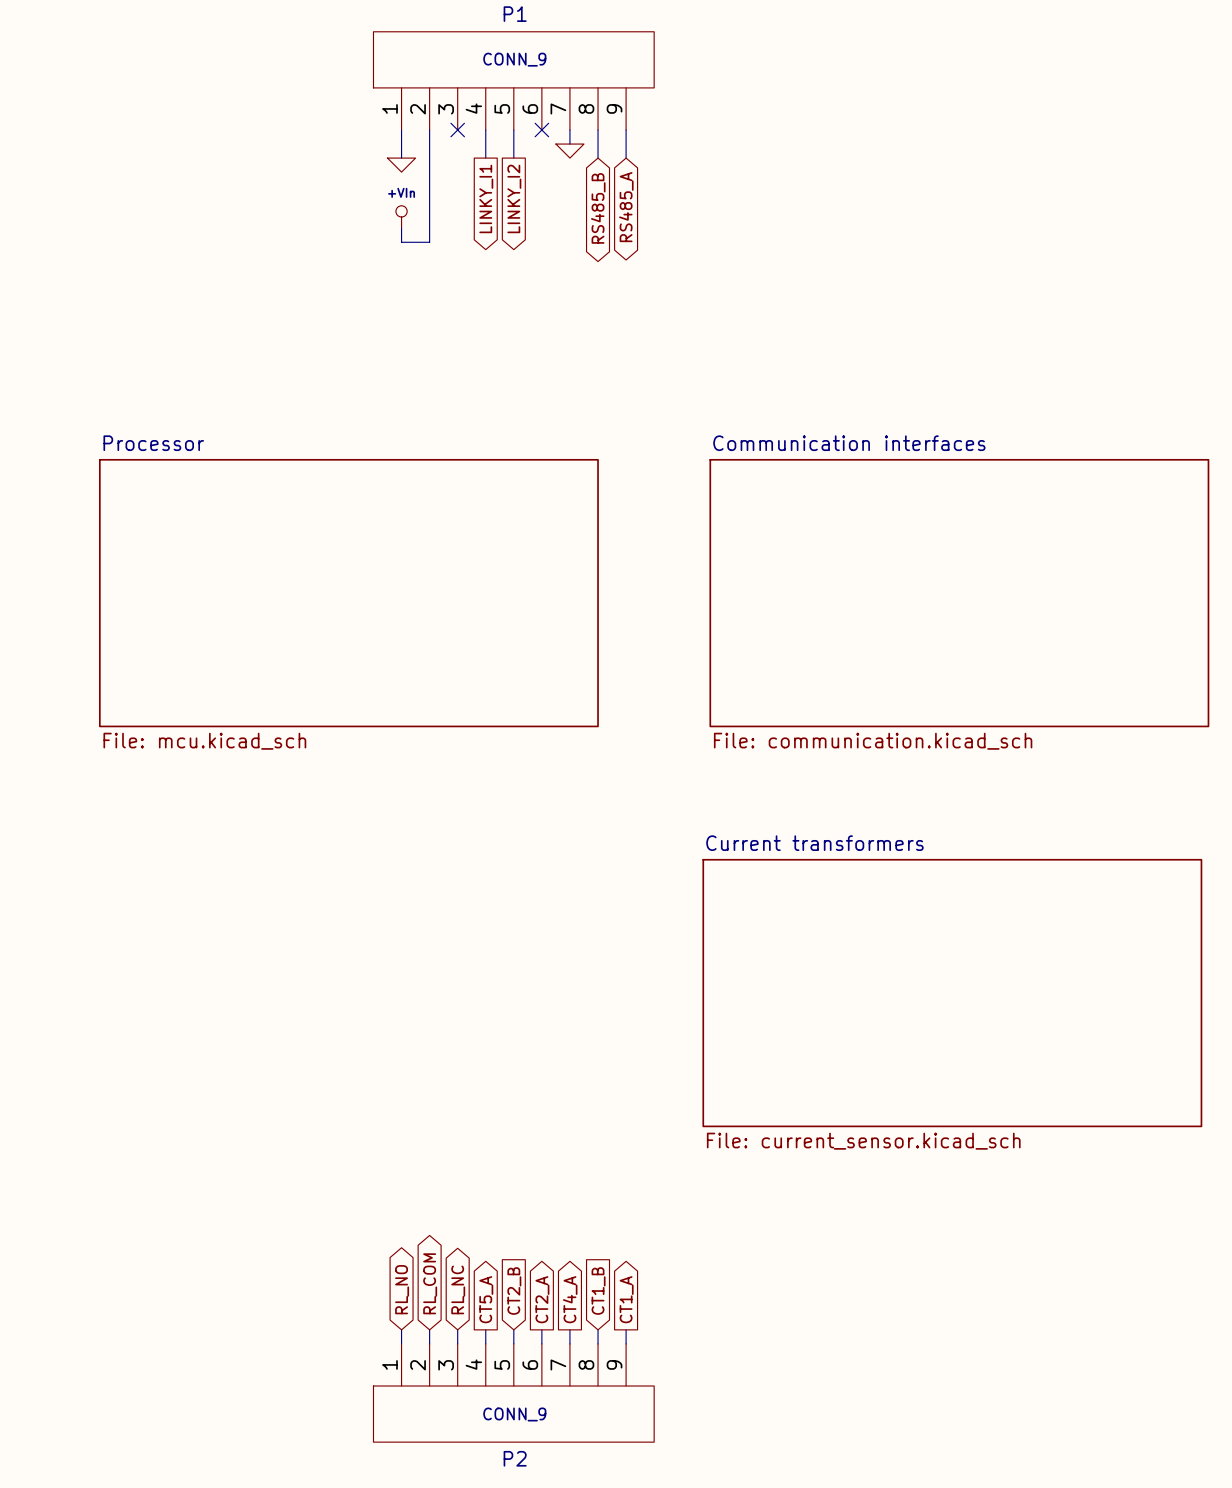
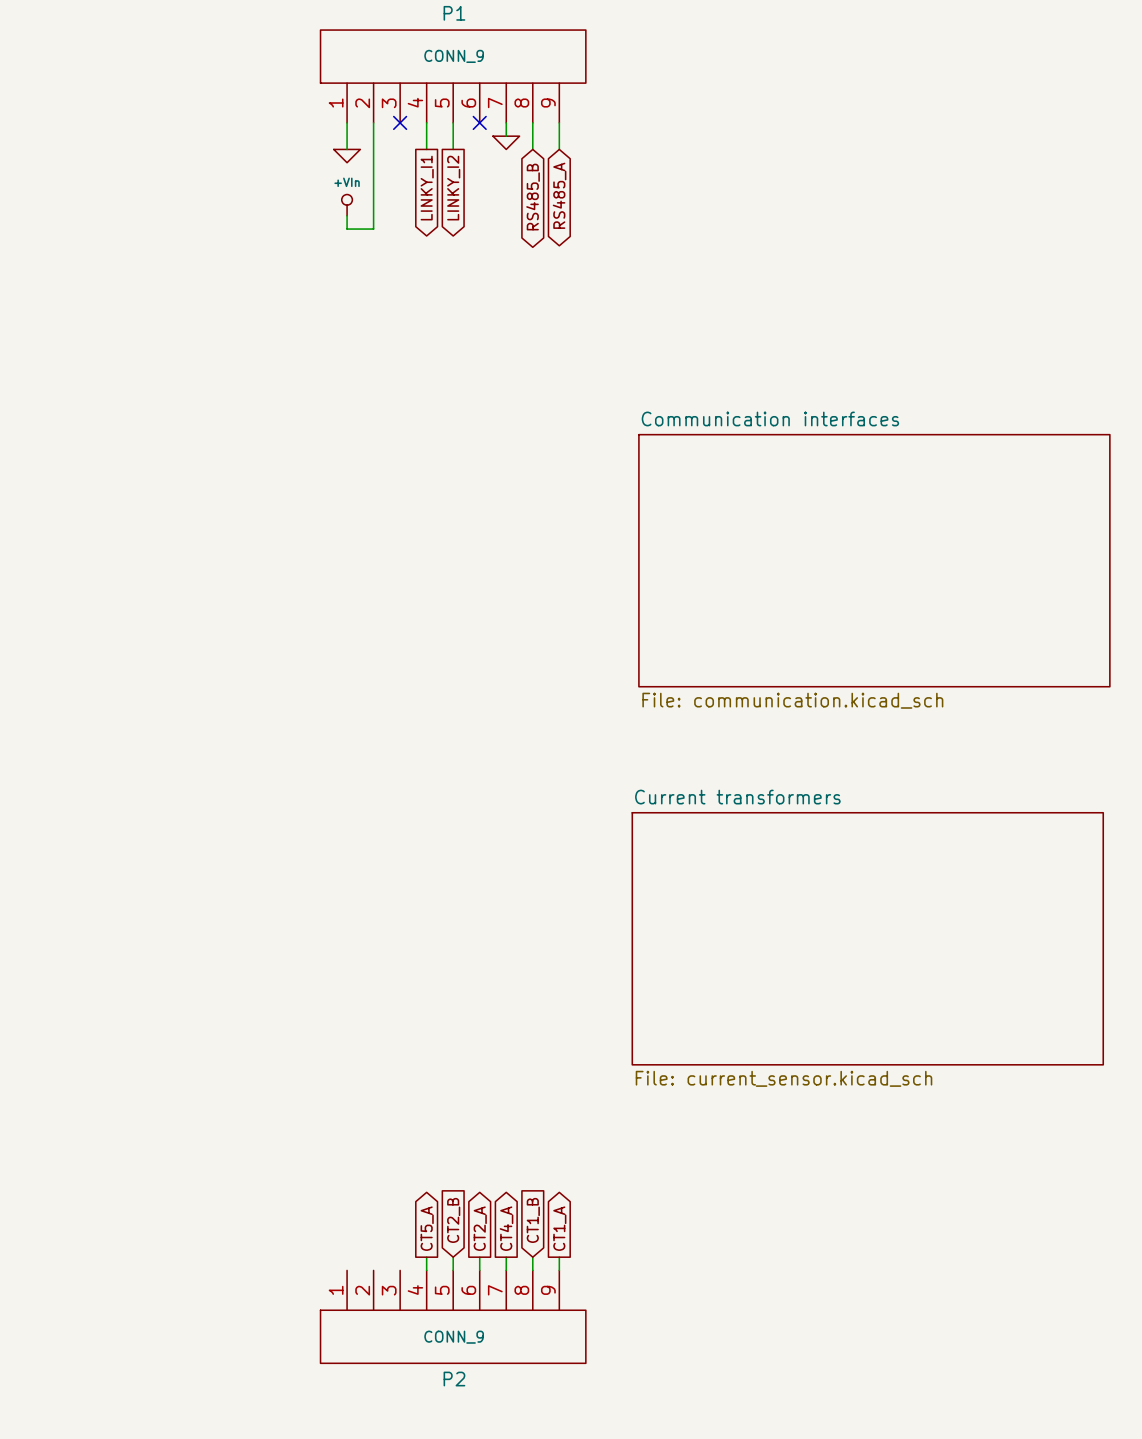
sheet Processor: File: mcu.kicad_sch (348, 593) -> none
global label: RL_COM (430, 1283) -> none
global label: RL_NO (402, 1289) -> none
global label: RL_NC (458, 1289) -> none
wire: (401, 1329) (401, 1343) -> none
wire: (429, 1329) (429, 1343) -> none
wire: (457, 1329) (457, 1343) -> none

